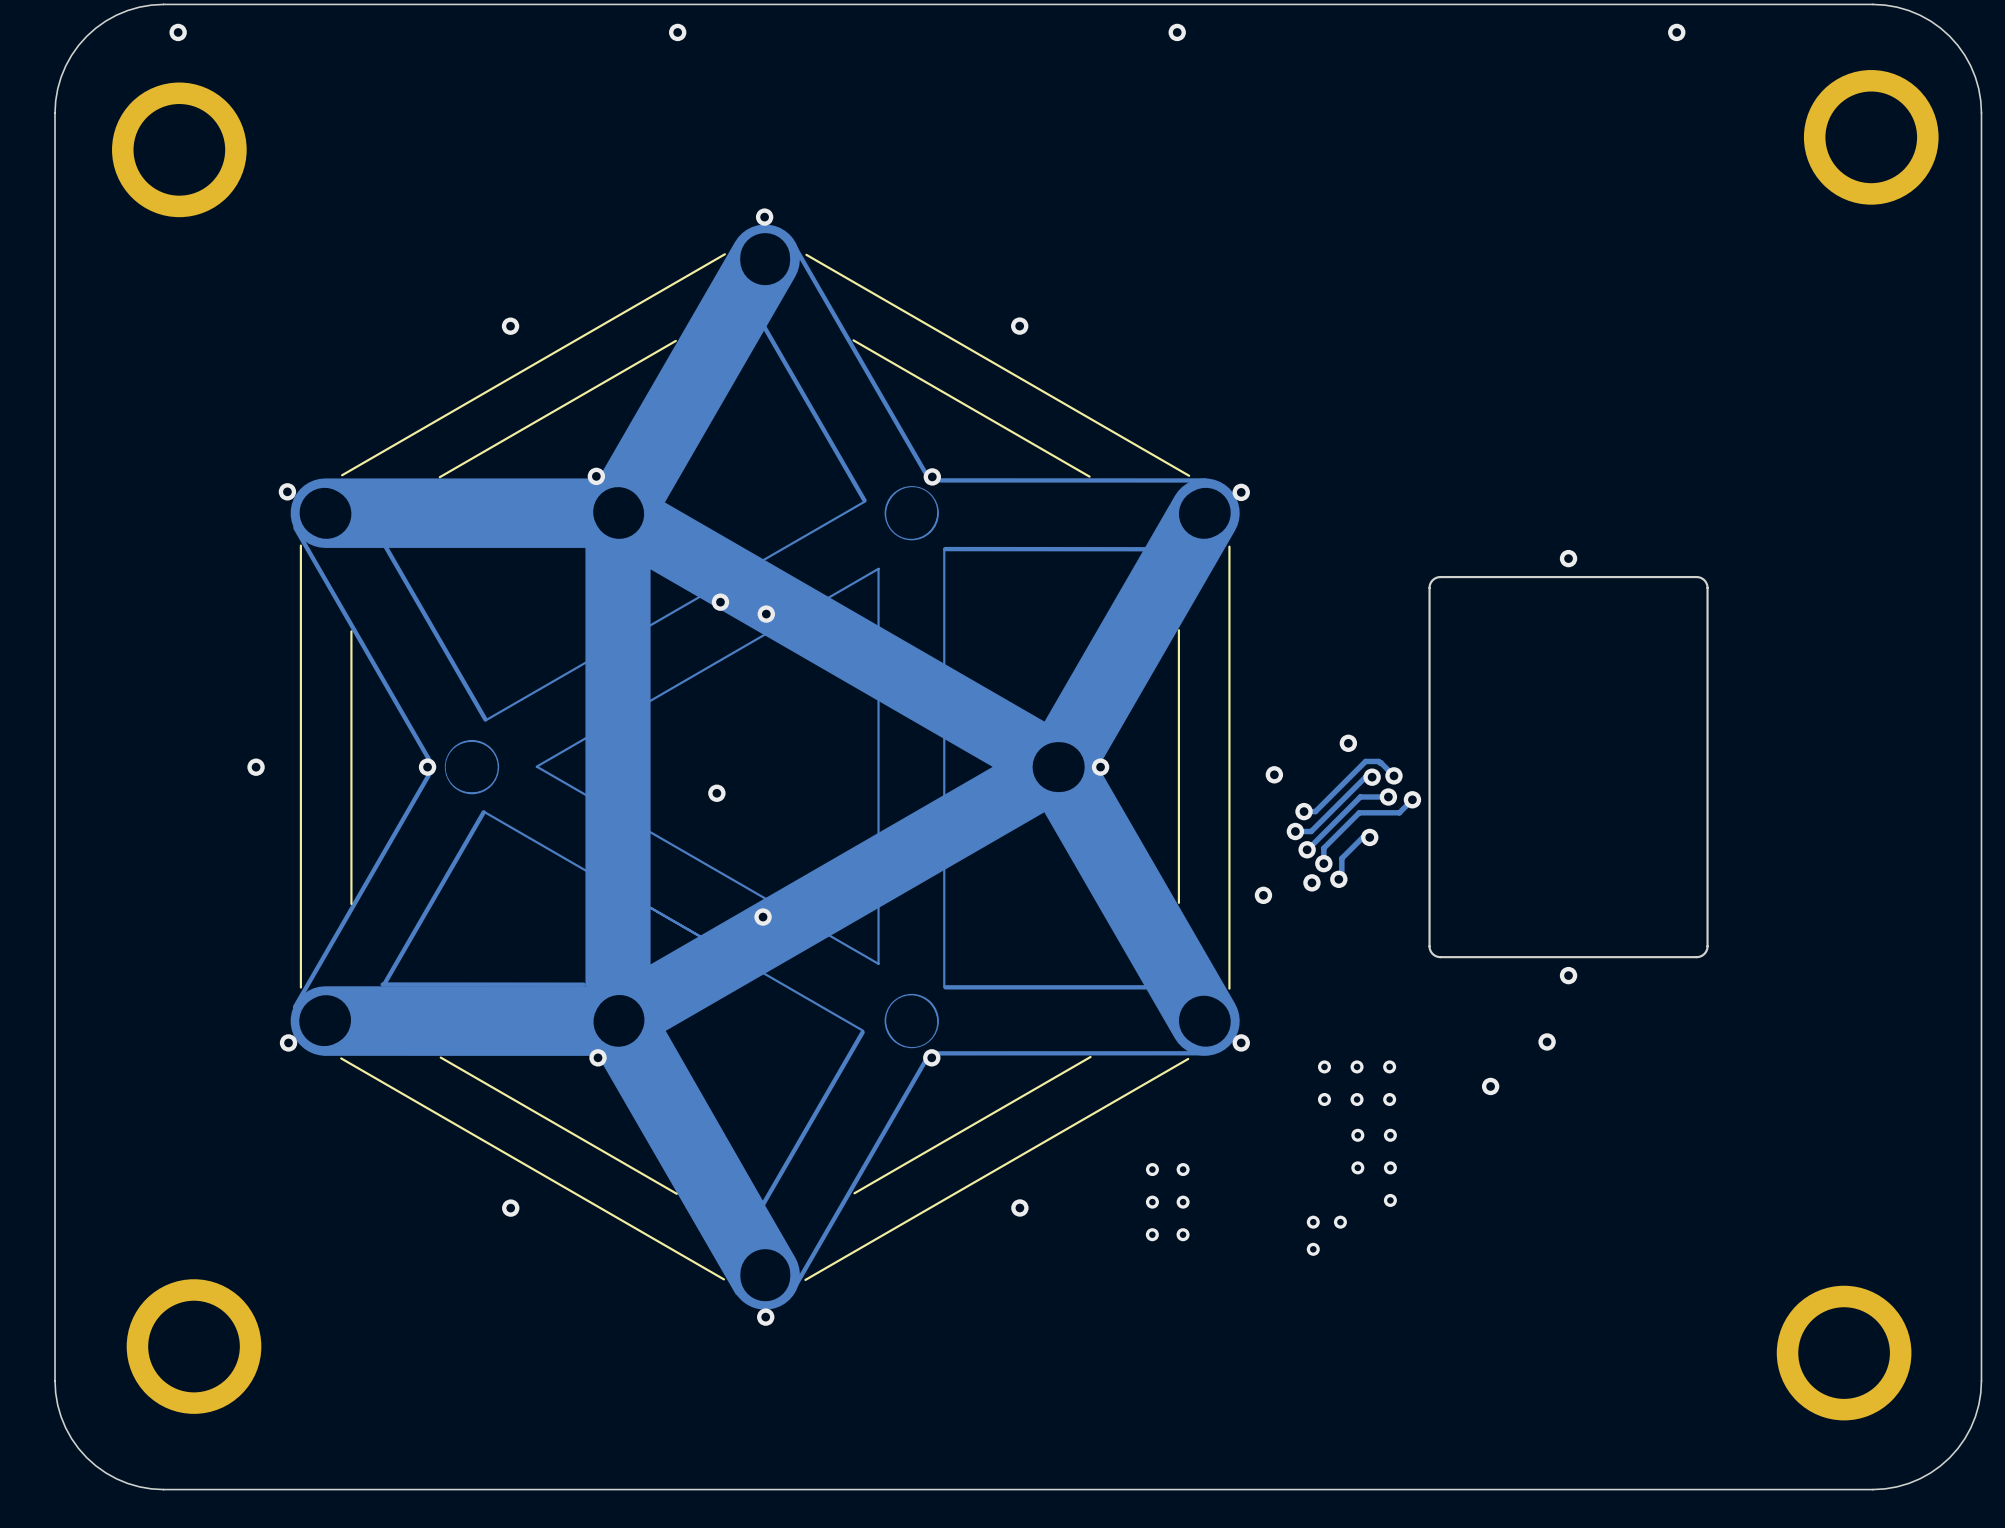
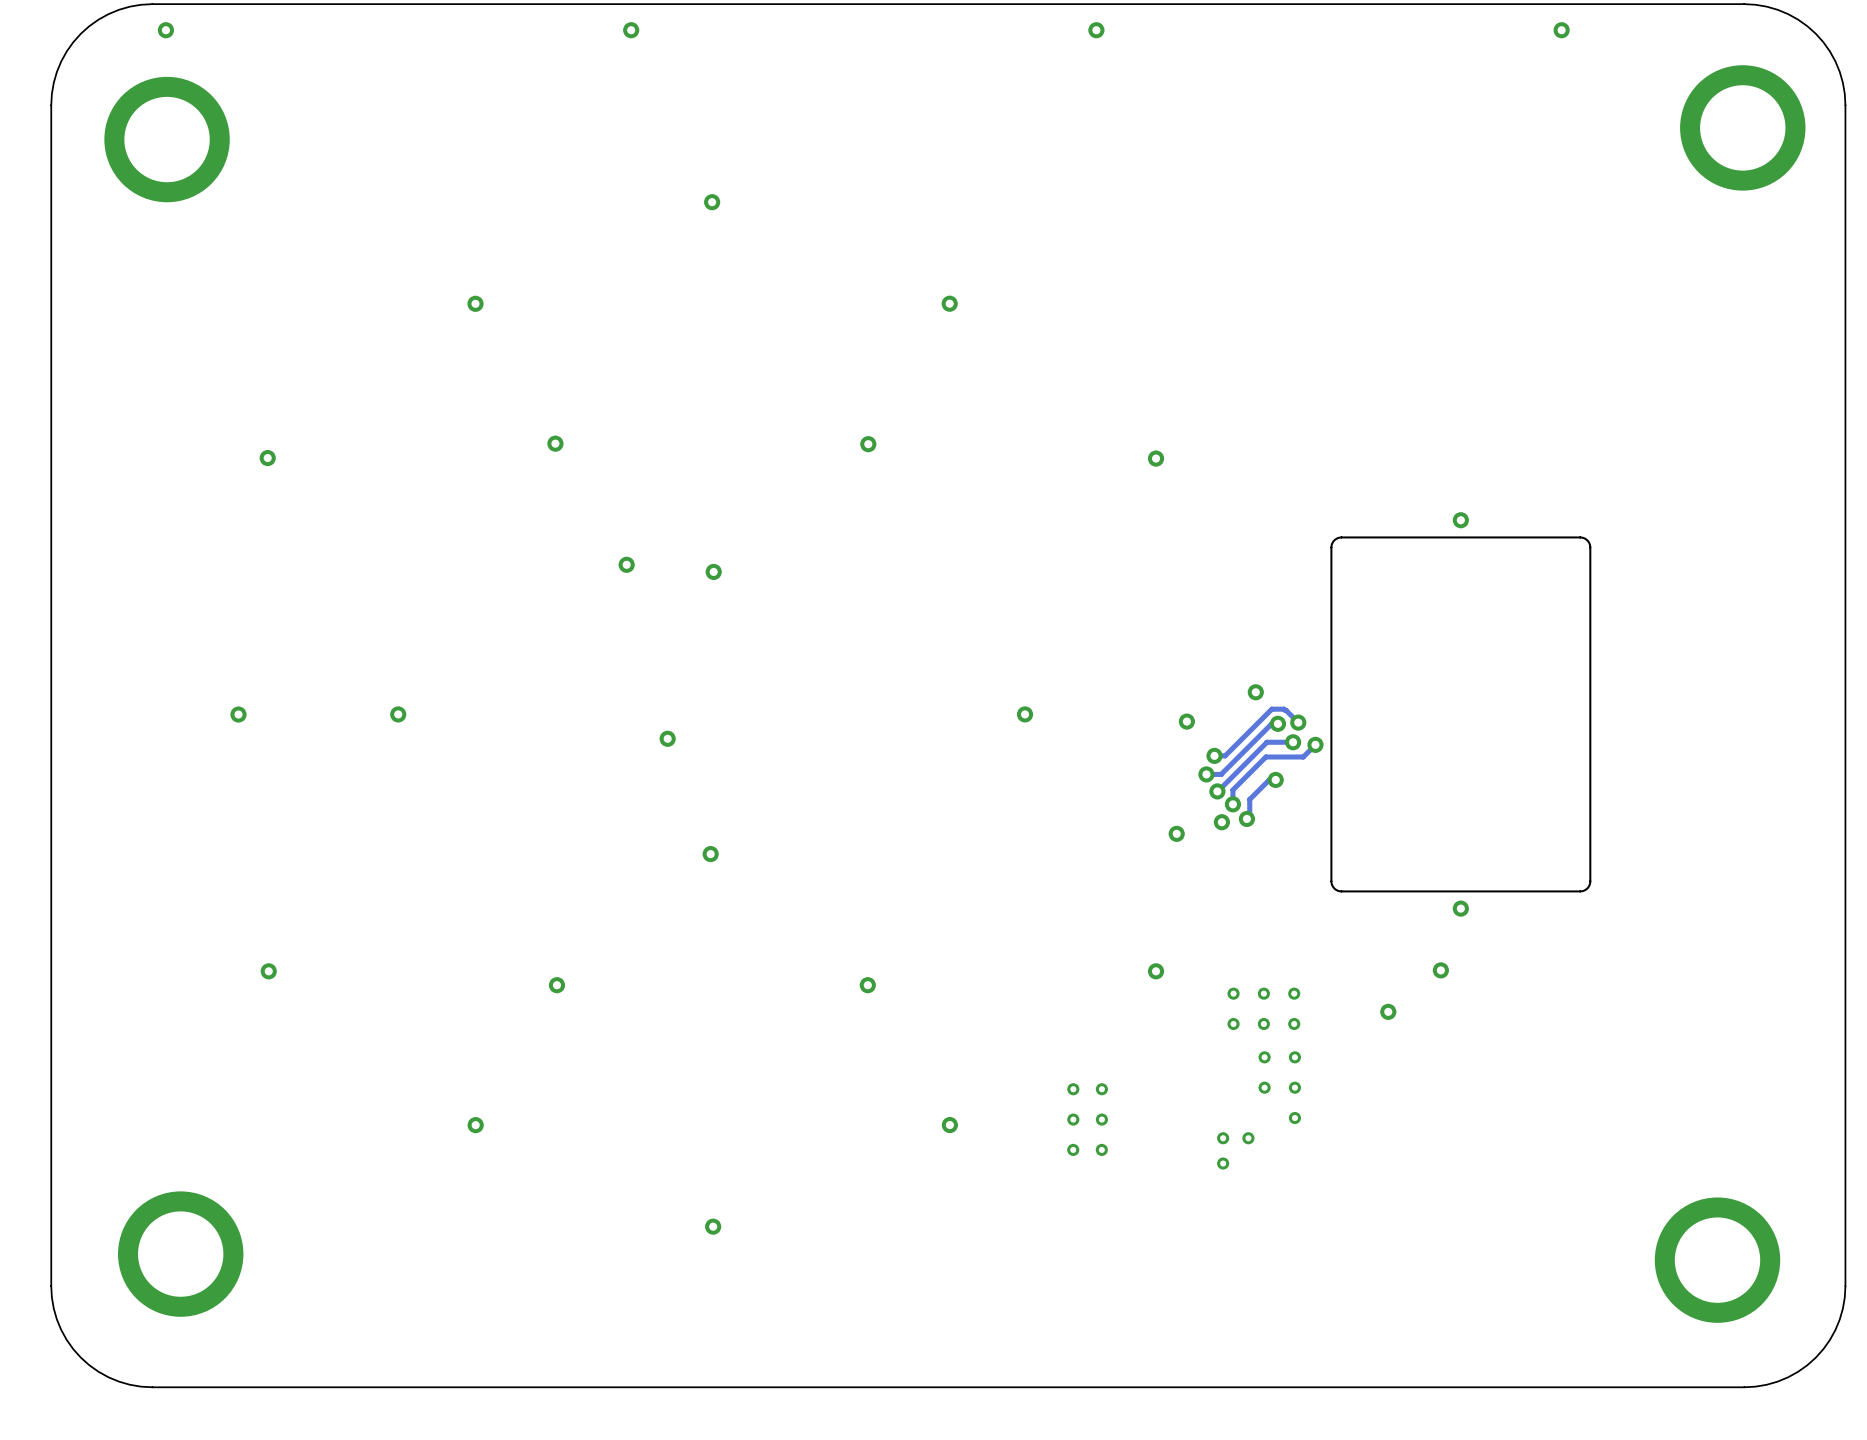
drawing: [290, 224, 1240, 1310] -> none
via position: (720, 602) -> (626, 564)

